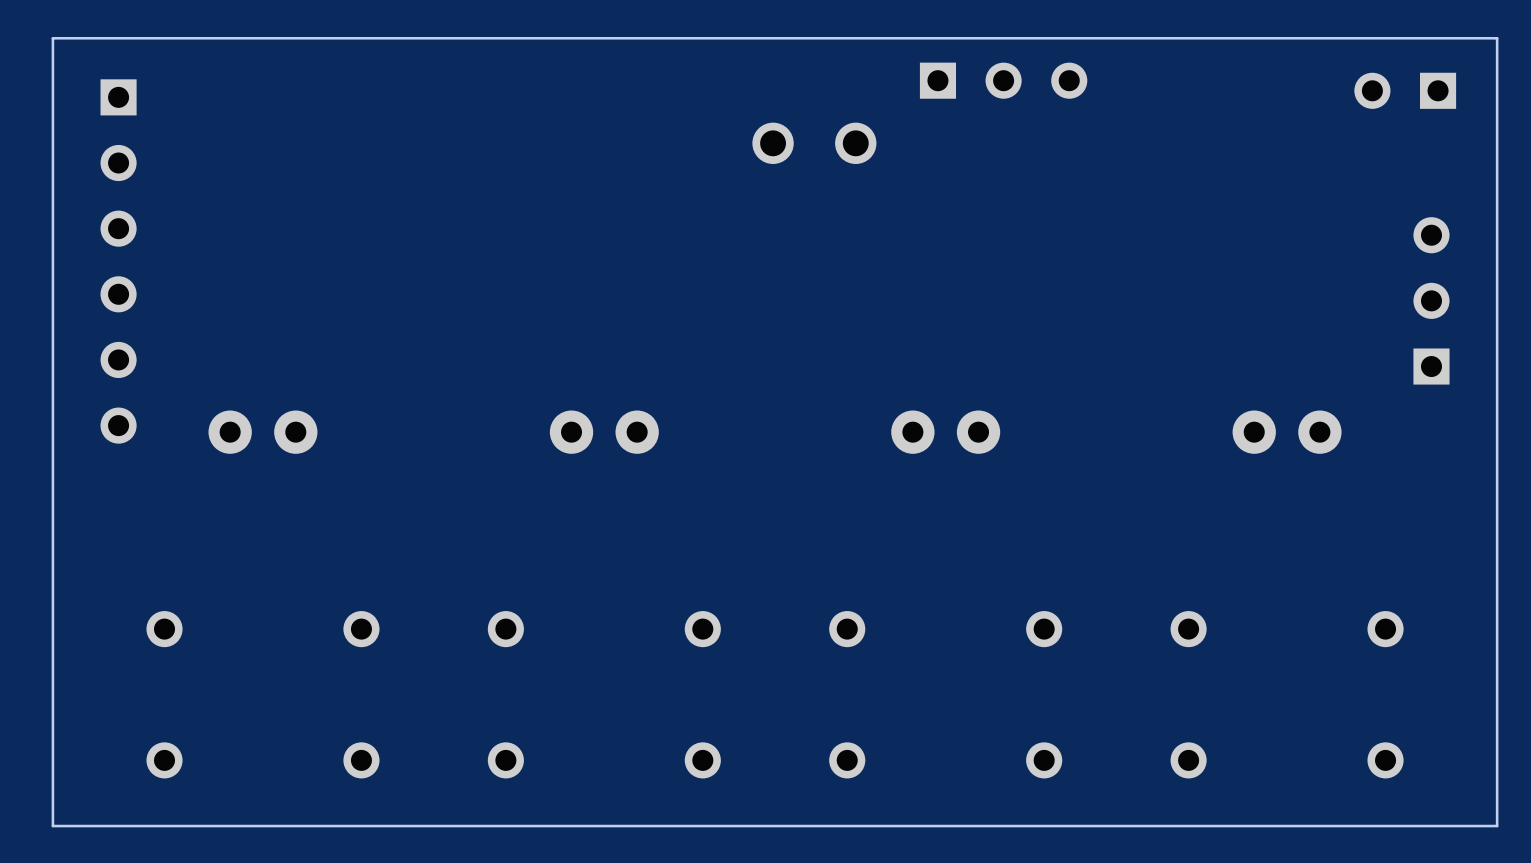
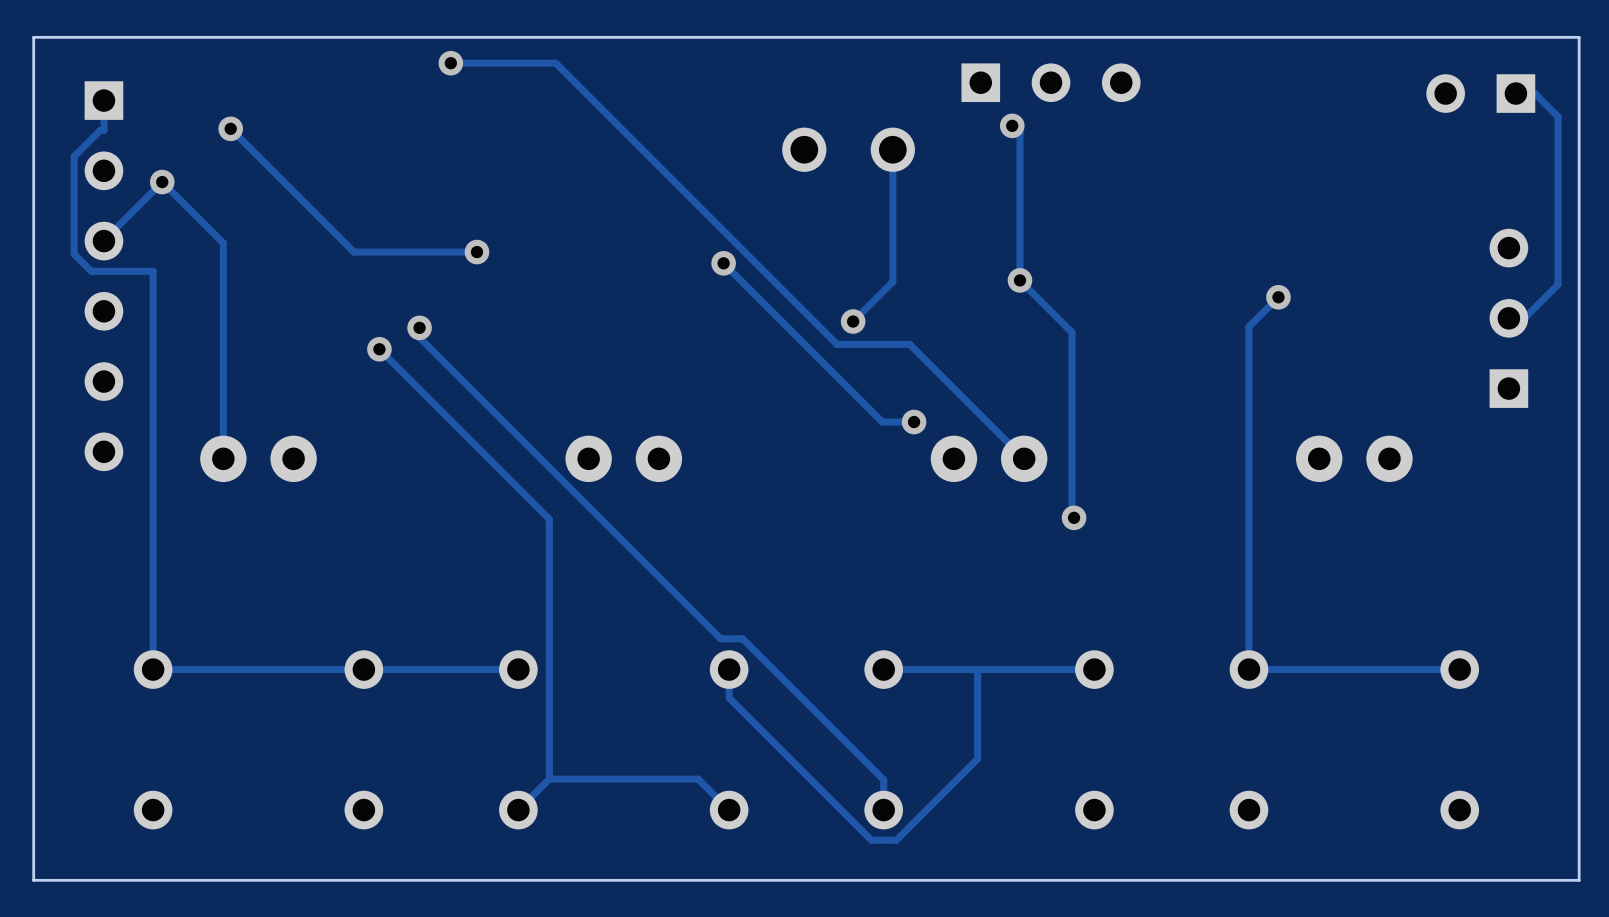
track: none -> (450, 63) (555, 63) (836, 344) (909, 344) (1024, 458)
via: none -> (450, 63)
track: none -> (1515, 93) (1534, 93) (1558, 116) (1558, 284) (1524, 318) (1508, 318)
track: none -> (103, 100) (103, 130) (100, 130) (74, 156) (74, 254) (91, 271) (153, 271) (153, 669) (518, 669)
track: none -> (1012, 125) (1019, 133) (1019, 280) (1071, 332) (1071, 515) (1074, 517)
via: none -> (1012, 125)
track: none -> (230, 128) (353, 252) (476, 252)
via: none -> (230, 128)
track: none -> (892, 149) (892, 281) (853, 321)
via: none -> (162, 182)
track: none -> (103, 241) (162, 182) (223, 243) (223, 458)
via: none -> (476, 252)
track: none -> (723, 263) (882, 422) (914, 422)
via: none -> (723, 263)
via: none -> (1019, 280)
track: none -> (1278, 297) (1248, 326) (1248, 669) (1459, 669)
via: none -> (1278, 297)
via: none -> (853, 321)
track: none -> (419, 327) (419, 337) (720, 638) (742, 638) (883, 779) (883, 810)
via: none -> (419, 327)
track: none -> (379, 349) (549, 519) (549, 779)
via: none -> (379, 349)
via: none -> (914, 422)
via: none -> (1074, 517)
track: none -> (977, 669) (977, 758) (896, 840) (871, 840) (729, 697) (729, 669)
track: none -> (1094, 669) (883, 669)
track: none -> (549, 779) (698, 779) (729, 810)
track: none -> (549, 779) (518, 810)

